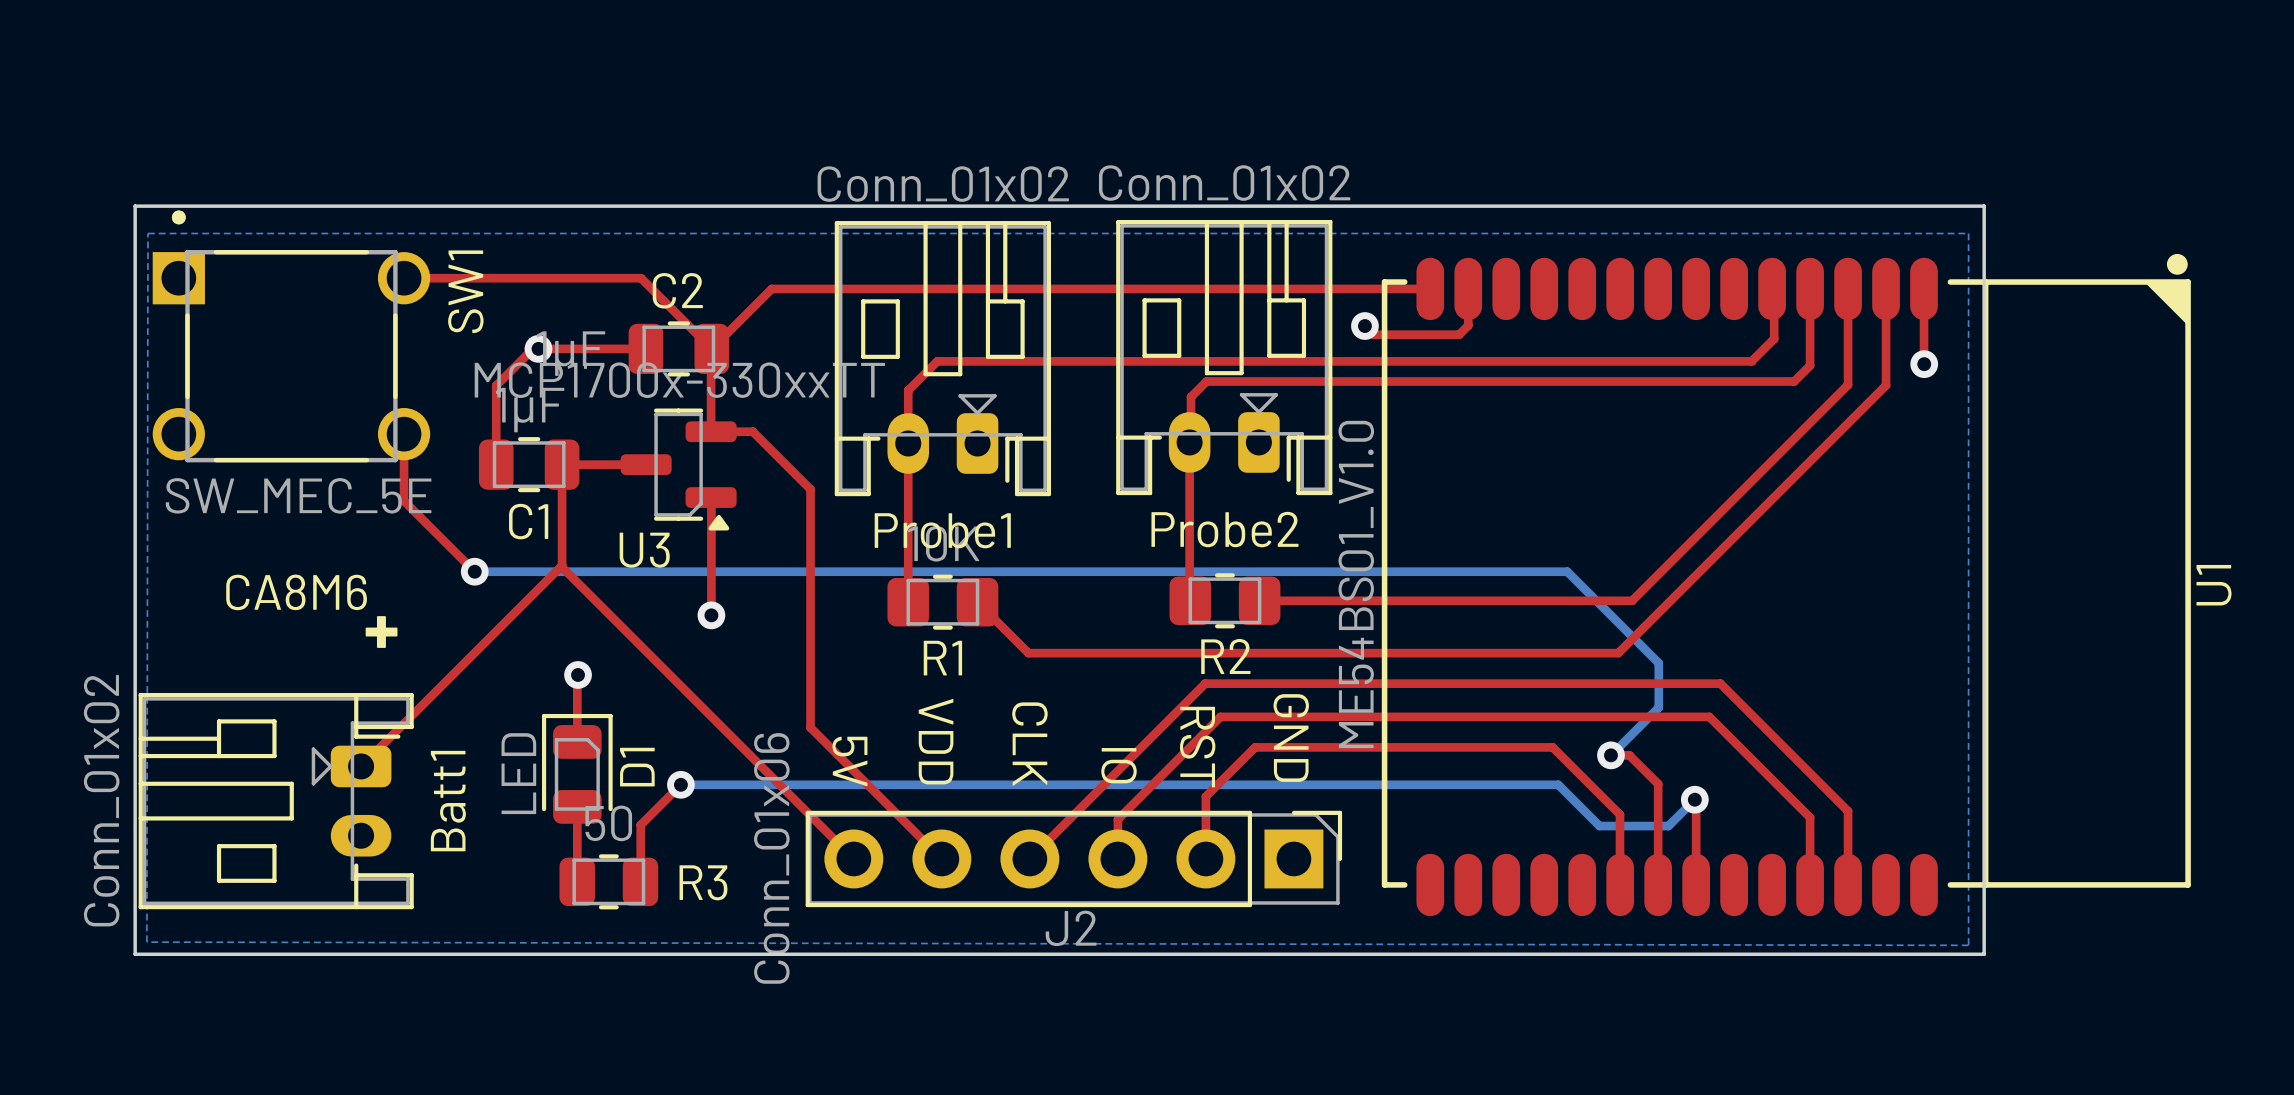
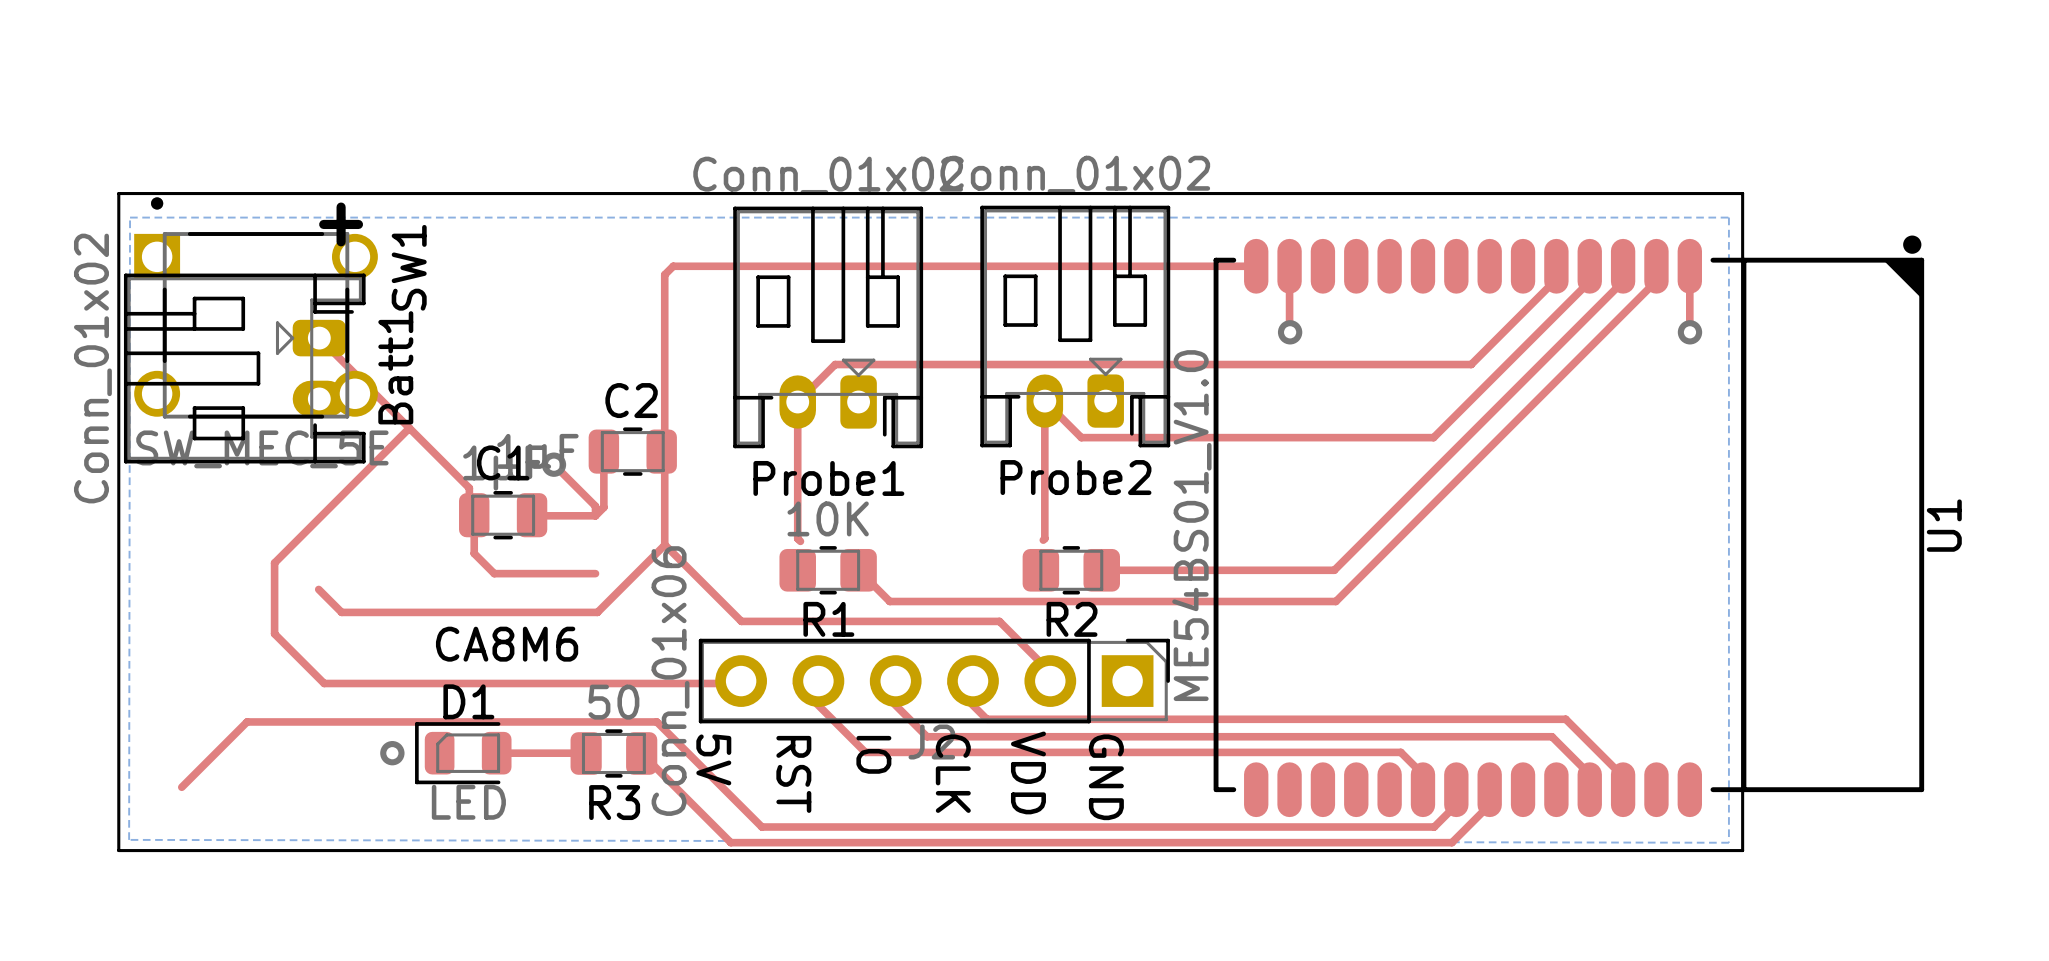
top track: (404, 278) (641, 278) (711, 348) -> none
top track: (771, 288) (711, 349) (711, 431) (752, 431) (810, 489) (810, 727) (941, 858) -> (677, 266) (673, 266) (664, 274) (664, 545) (597, 612) (341, 612) (318, 589)
top track: (1772, 288) (1774, 291) (1774, 338) (1751, 361) (937, 361) (908, 390) (908, 443) -> (1556, 279) (1471, 364) (835, 364) (797, 401)
top track: (1810, 306) (1810, 365) (1794, 381) (1206, 381) (1191, 397) (1189, 442) -> (1589, 281) (1433, 437) (1081, 437) (1044, 401)
top track: (1848, 306) (1848, 384) (1632, 600) (1259, 600) -> (1623, 281) (1334, 570) (1101, 570)
top track: (1886, 306) (1886, 385) (1618, 653) (1028, 653) (977, 602) -> (1656, 280) (1335, 601) (889, 601) (858, 570)
top track: (1468, 325) (1459, 334) (1373, 334) (1364, 326) -> (1289, 298) (1290, 332)
via position: (1364, 326) -> (1290, 332)
top track: (528, 348) (645, 348) -> none
top track: (532, 348) (496, 385) (496, 464) -> none
via: (538, 348) -> none
C2 position: (678, 348) -> (632, 451)
top track: none -> (319, 338) (469, 488) (469, 517)
top track: (404, 434) (404, 501) (474, 571) -> none
C1 position: (529, 464) -> (503, 515)
top track: (646, 464) (562, 464) (562, 567) (853, 858) -> none
U3: MCP1700x-330xxTT (678, 469) -> none
top track: none -> (409, 428) (274, 562) (274, 633) (324, 683) (717, 683)
top track: (711, 497) (711, 615) -> none
top track: none -> (601, 453) (603, 451) (603, 507) (595, 515)
top track: none -> (553, 464) (595, 506) (595, 515)
via: none -> (553, 464)
C1 name position: C1 (528, 521) -> C1 (503, 462)
top track: (562, 565) (361, 766) -> none
bottom track: (474, 571) (1567, 571) (1658, 663) (1658, 707) (1610, 755) -> none
via: (474, 571) -> none
top track: none -> (474, 515) (474, 553) (494, 573) (595, 573)
top track: none -> (532, 515) (595, 515)
text position: CA8M6 (296, 592) -> CA8M6 (507, 644)
R2 position: (1224, 600) -> (1071, 570)
R1 position: (942, 602) -> (828, 570)
top track: none -> (664, 544) (741, 621) (999, 621) (1050, 672) (1050, 681)
via: (711, 615) -> none
text position: + (381, 632) -> + (341, 224)
top track: (578, 674) (577, 741) -> none
via: (578, 674) -> none
text position: GND (1291, 738) -> GND (1106, 777)
text position: VDD (936, 741) -> VDD (1028, 772)
text position: CLK (1029, 744) -> CLK (953, 773)
text position: RST (1197, 747) -> RST (793, 774)
top track: (1610, 755) (1629, 755) (1658, 784) (1658, 867) -> none
via: (1610, 755) -> none
text position: 5V (849, 761) -> 5V (713, 759)
top track: none -> (873, 683) (927, 736) (1552, 736) (1589, 774)
top track: none -> (951, 683) (986, 719) (1565, 719) (1623, 776)
text position: IO (1119, 765) -> IO (873, 754)
D1 rotation: 0° (577, 768) -> 90° counterclockwise (463, 753)
D1 position: (577, 768) -> (463, 753)
top track: (680, 784) (640, 825) (640, 881) -> none
bottom track: (680, 784) (1558, 784) (1599, 826) (1668, 826) (1694, 799) -> none
via: (680, 784) -> none
top track: (1694, 799) (1696, 867) -> none
via: (1694, 799) -> none
Batt1 position: (276, 801) -> (244, 368)
top track: (577, 806) (577, 881) -> none
via: none -> (392, 753)
top track: none -> (496, 753) (583, 753)
top track: none -> (641, 753) (730, 842) (1451, 842) (1489, 804)
top track: (1029, 858) (1205, 683) (1720, 683) (1848, 811) (1848, 867) -> none
J2 position: (1073, 858) -> (934, 681)
top track: (1117, 858) (1117, 819) (1220, 716) (1709, 716) (1810, 817) (1810, 867) (1806, 870) -> none
top track: (1205, 858) (1205, 796) (1255, 747) (1552, 747) (1619, 814) (1619, 867) -> (796, 683) (865, 752) (1400, 752) (1422, 774)
R3 position: (608, 881) -> (613, 753)
top track: none -> (181, 787) (247, 721) (656, 721) (761, 827) (1434, 827) (1456, 804)
R3 name position: R3 (703, 882) -> R3 (614, 802)

